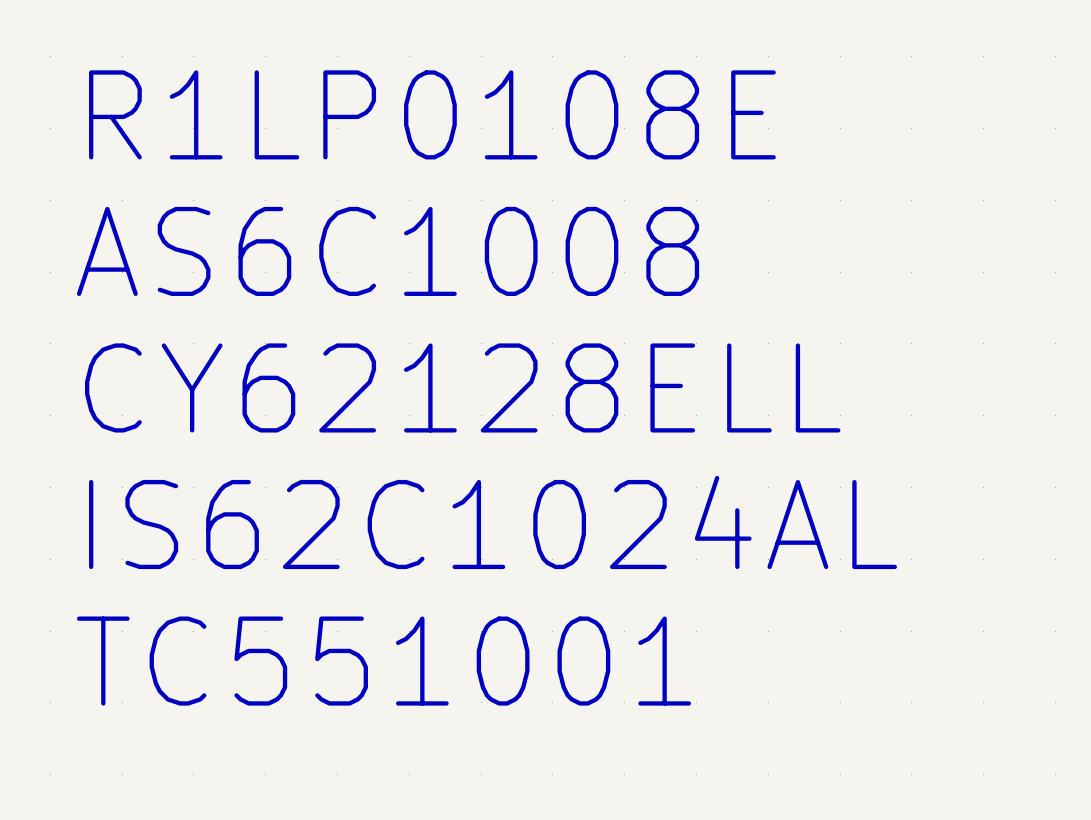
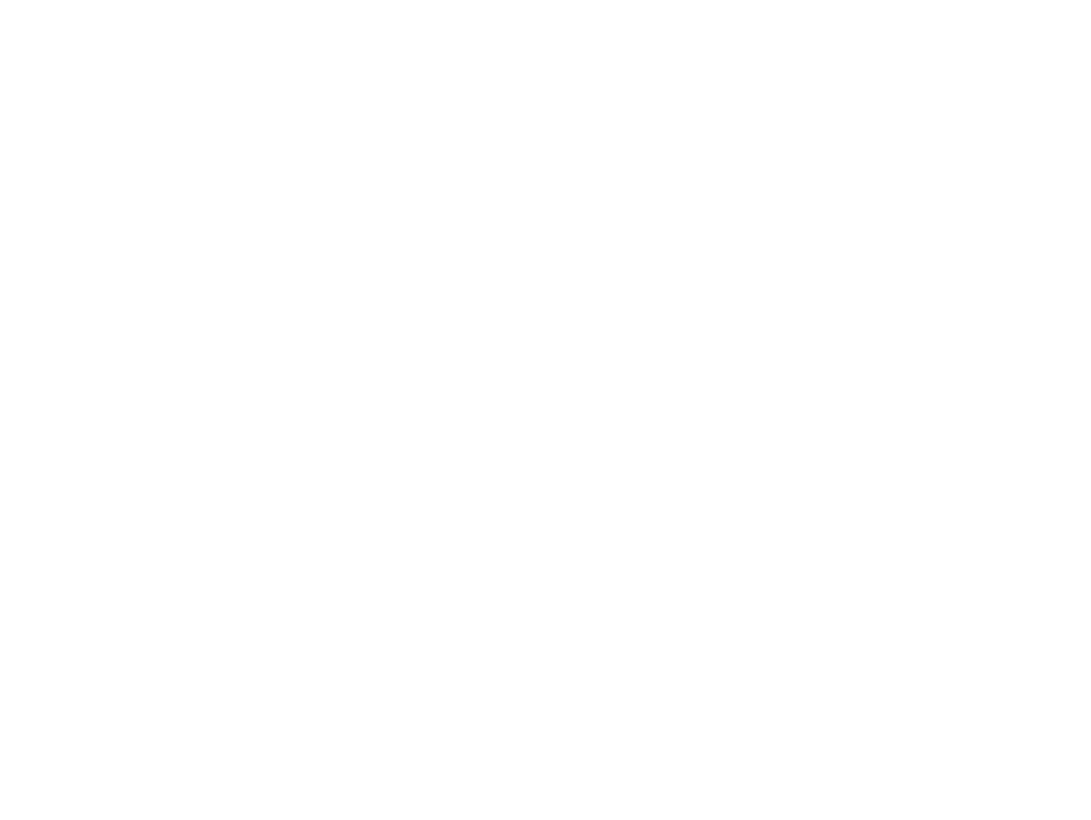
text: R1LP0108E (432, 114) -> none
text: AS6C1008 (388, 251) -> none
text: CY62128ELL (462, 387) -> none
text: IS62C1024AL (493, 522) -> none
text: TC551001 (383, 661) -> none

